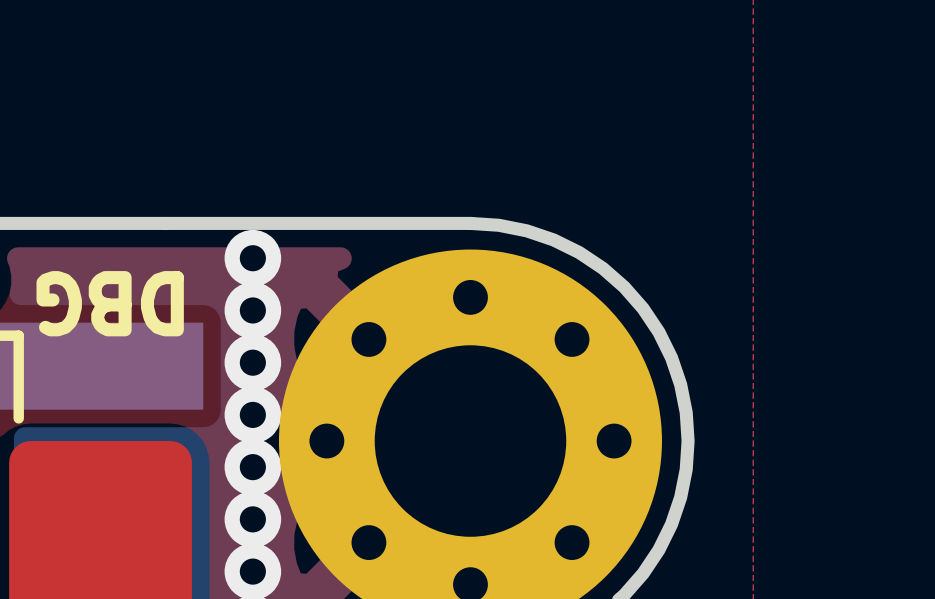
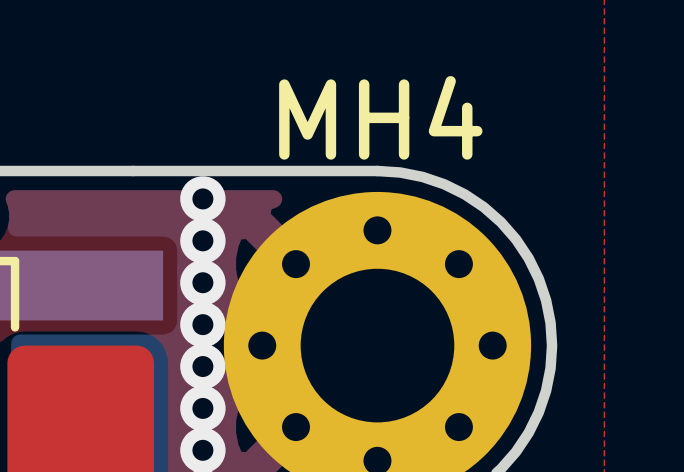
MH4 name: none -> MH4 (380, 117)
text: DBG (110, 303) -> none

